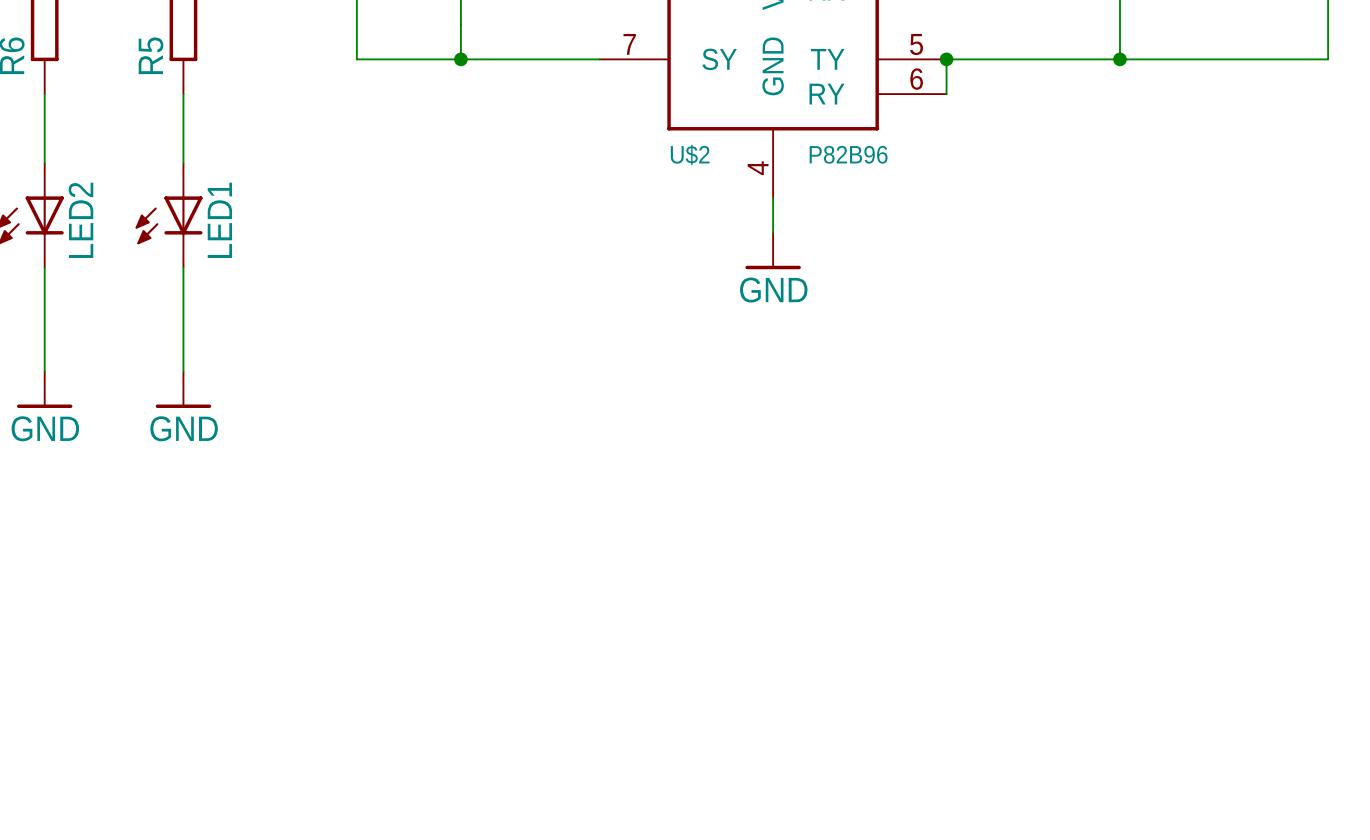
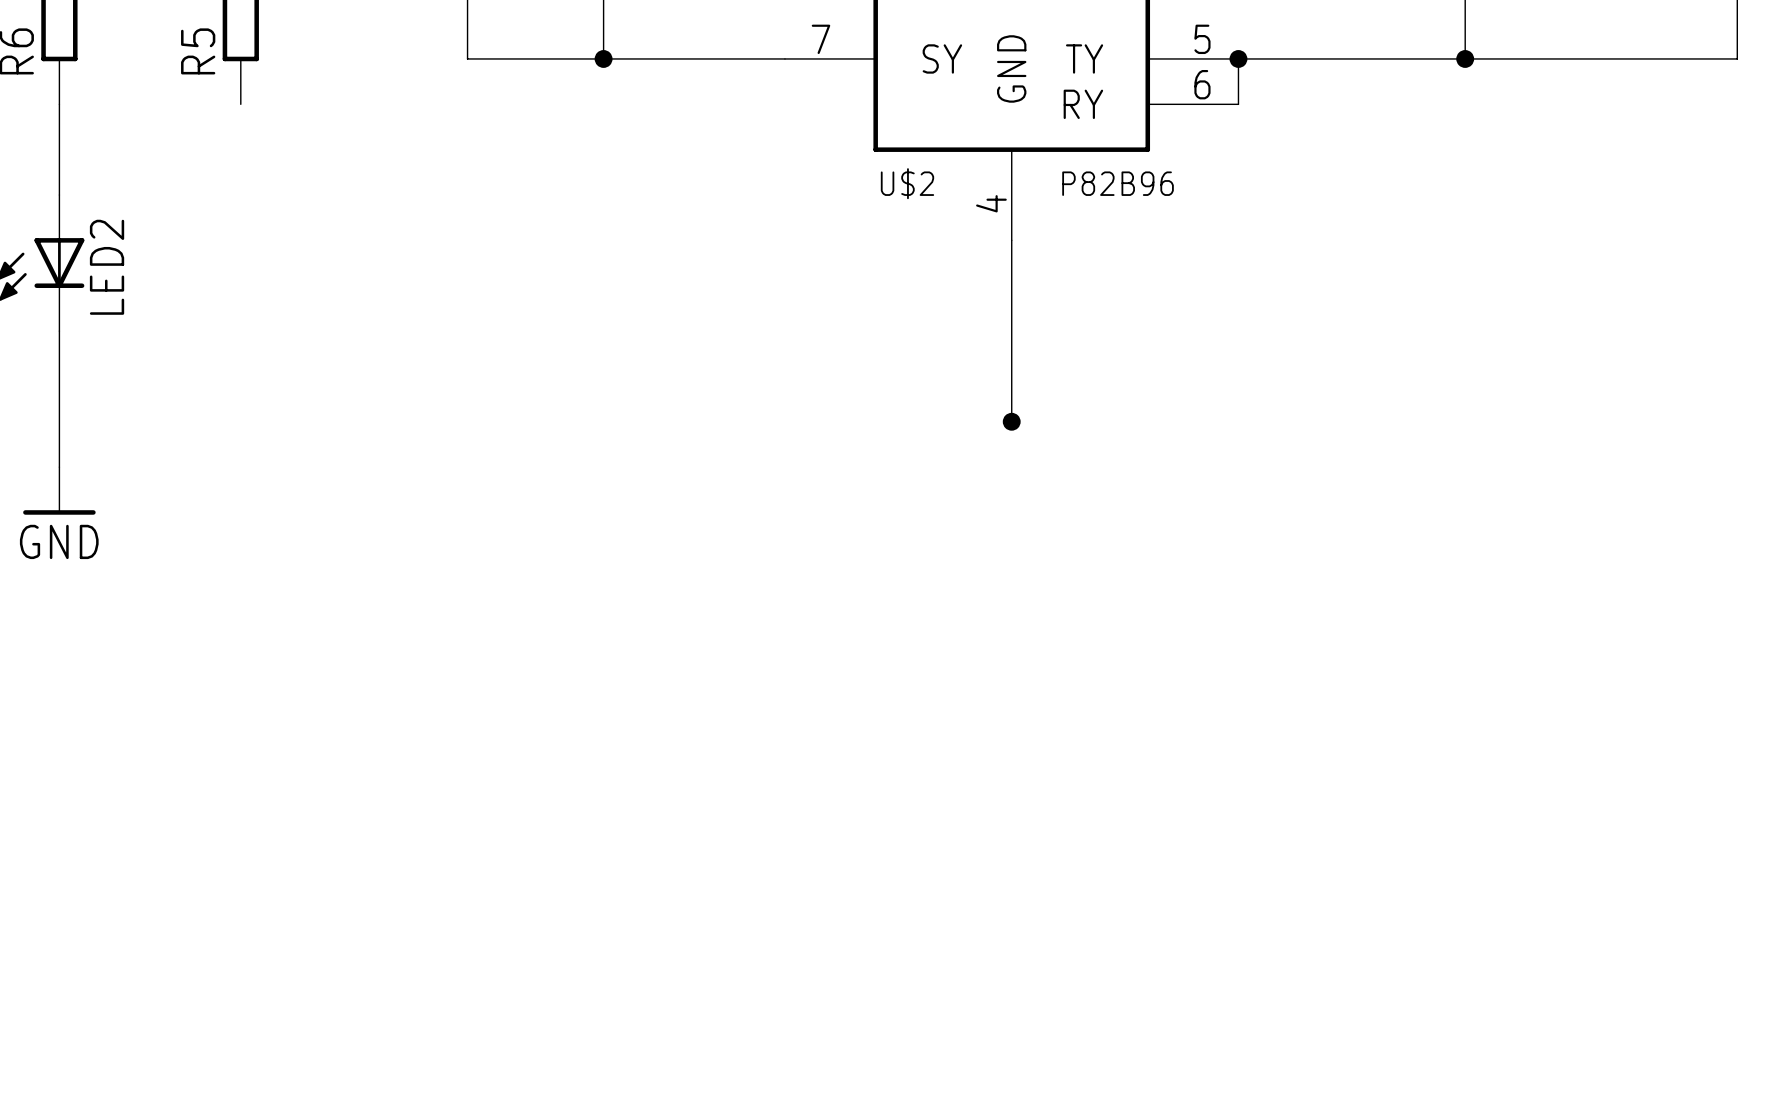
wire: (183, 94) (183, 163) -> none
LED1: (169, 215) -> none
wire: none -> (1011, 285) (1011, 421)
power symbol: GND (773, 251) -> none
wire: (183, 267) (183, 371) -> none
junction: none -> (1011, 421)
power symbol: GND (183, 389) -> none

